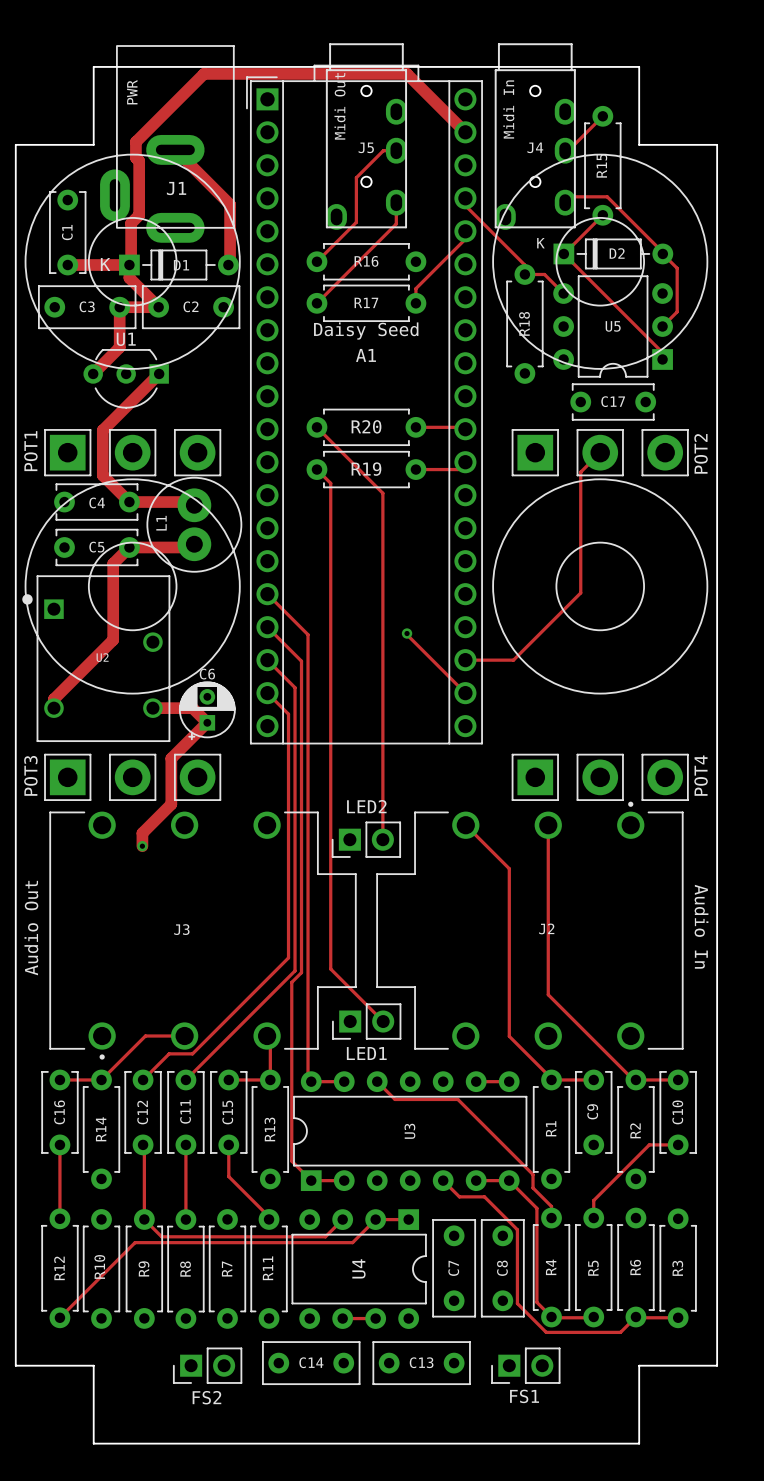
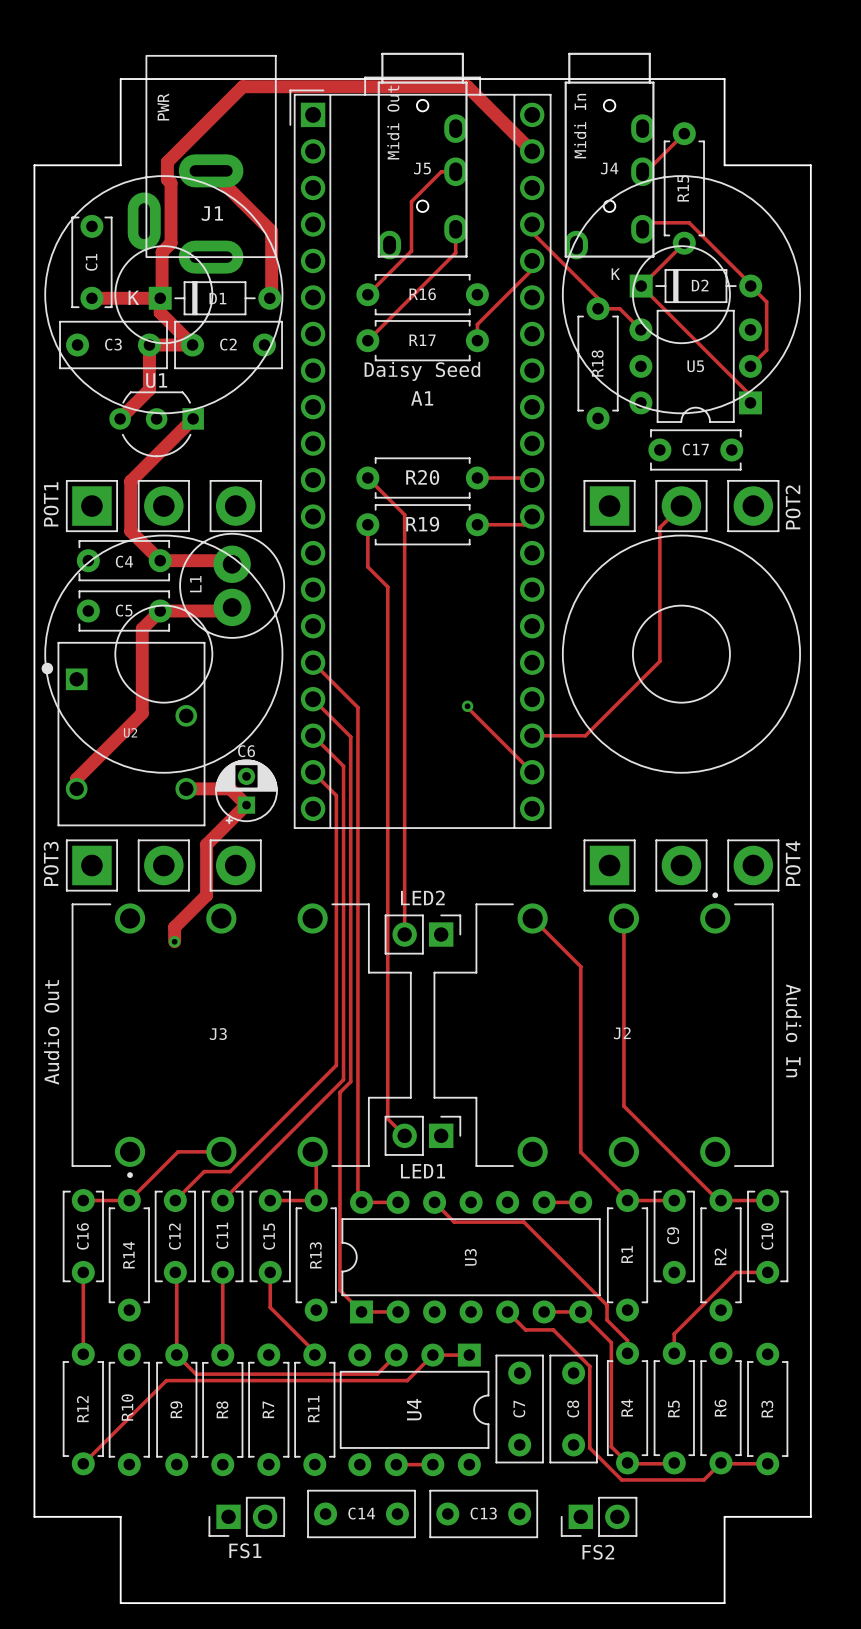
track: (350, 460) (382, 493) (382, 839) -> (404, 514) (404, 934)
track: (316, 469) (330, 483) (330, 969) (383, 1021) -> (367, 524) (367, 567) (387, 586) (387, 1118) (404, 1135)
LED2 rotation: 0° (366, 839) -> 180° (422, 934)
LED1 rotation: 0° (366, 1021) -> 180° (422, 1135)
FS1 name: FS1 (524, 1396) -> FS2 (598, 1552)
FS2 name: FS2 (206, 1397) -> FS1 (245, 1550)

